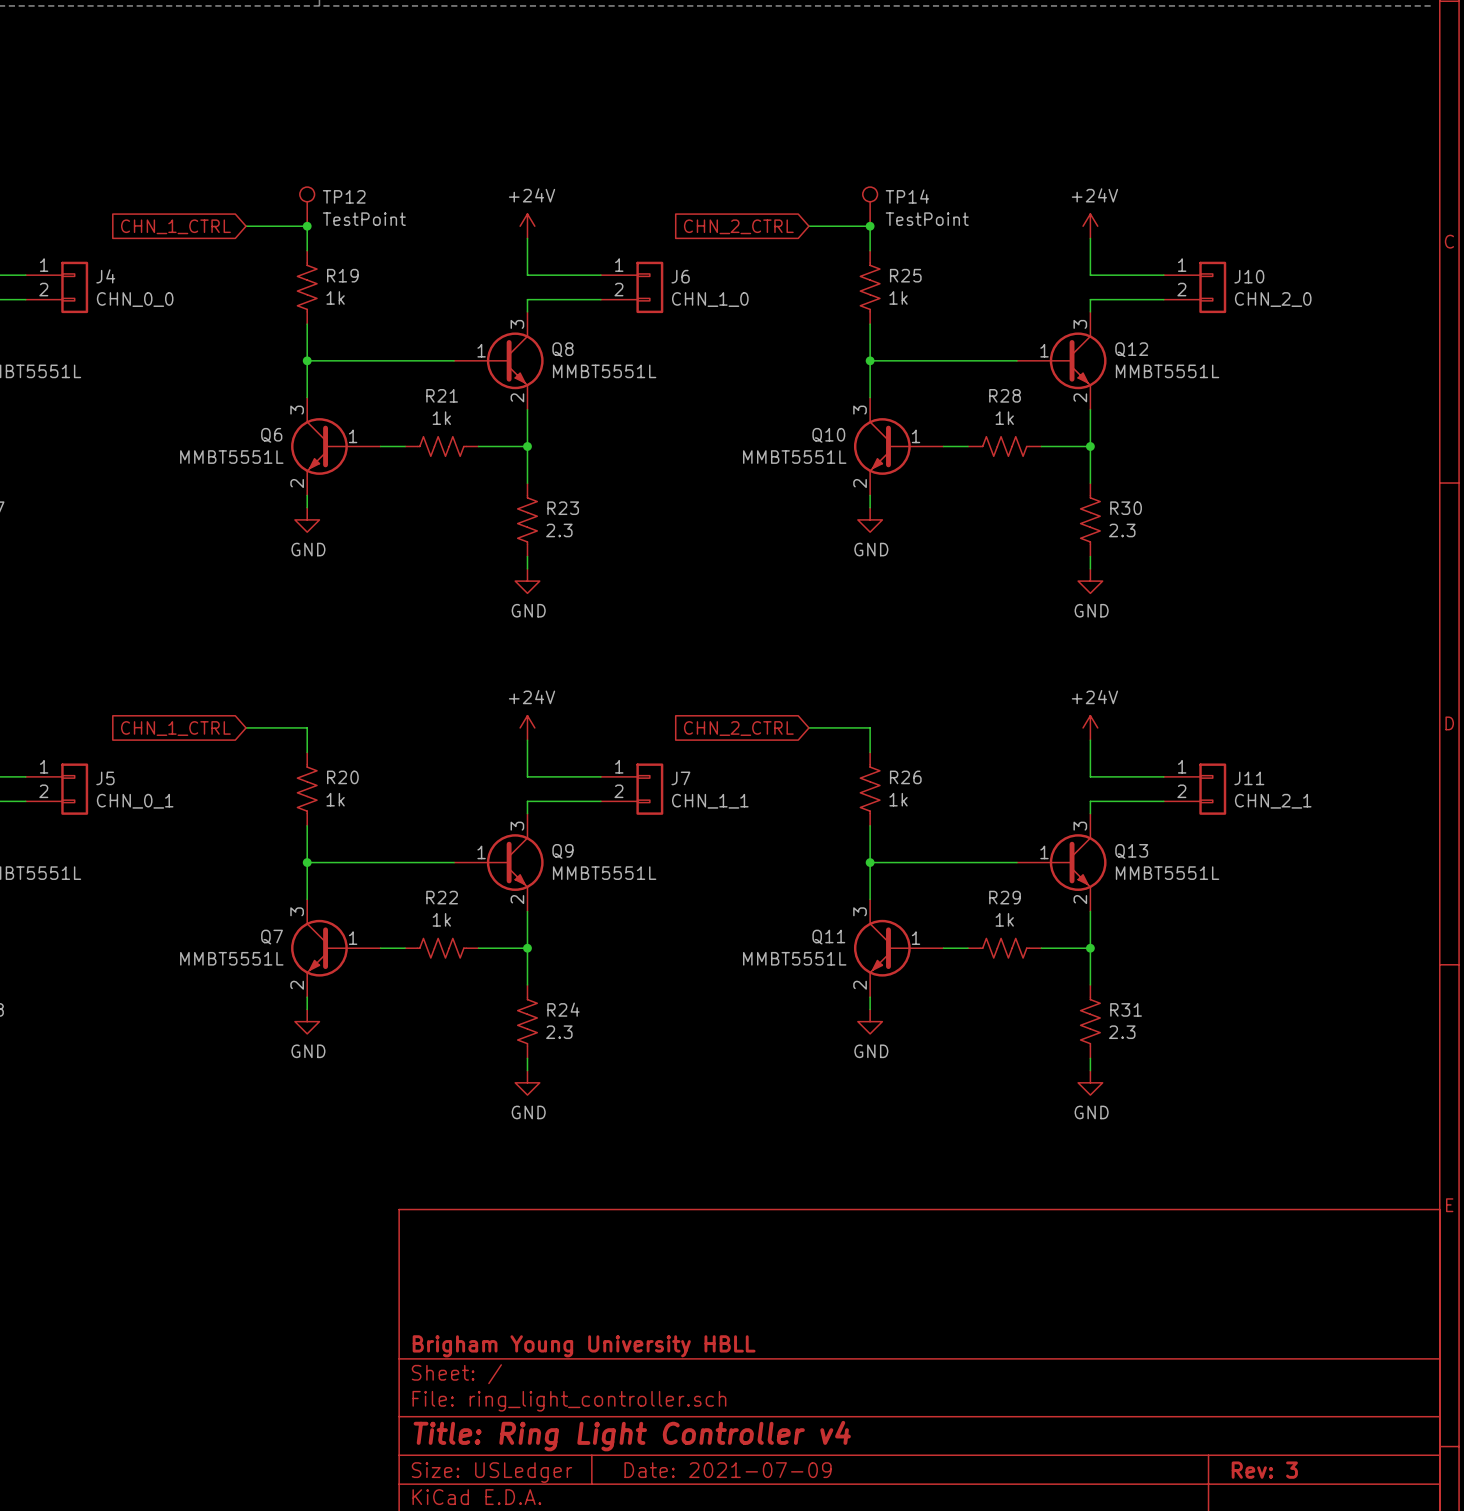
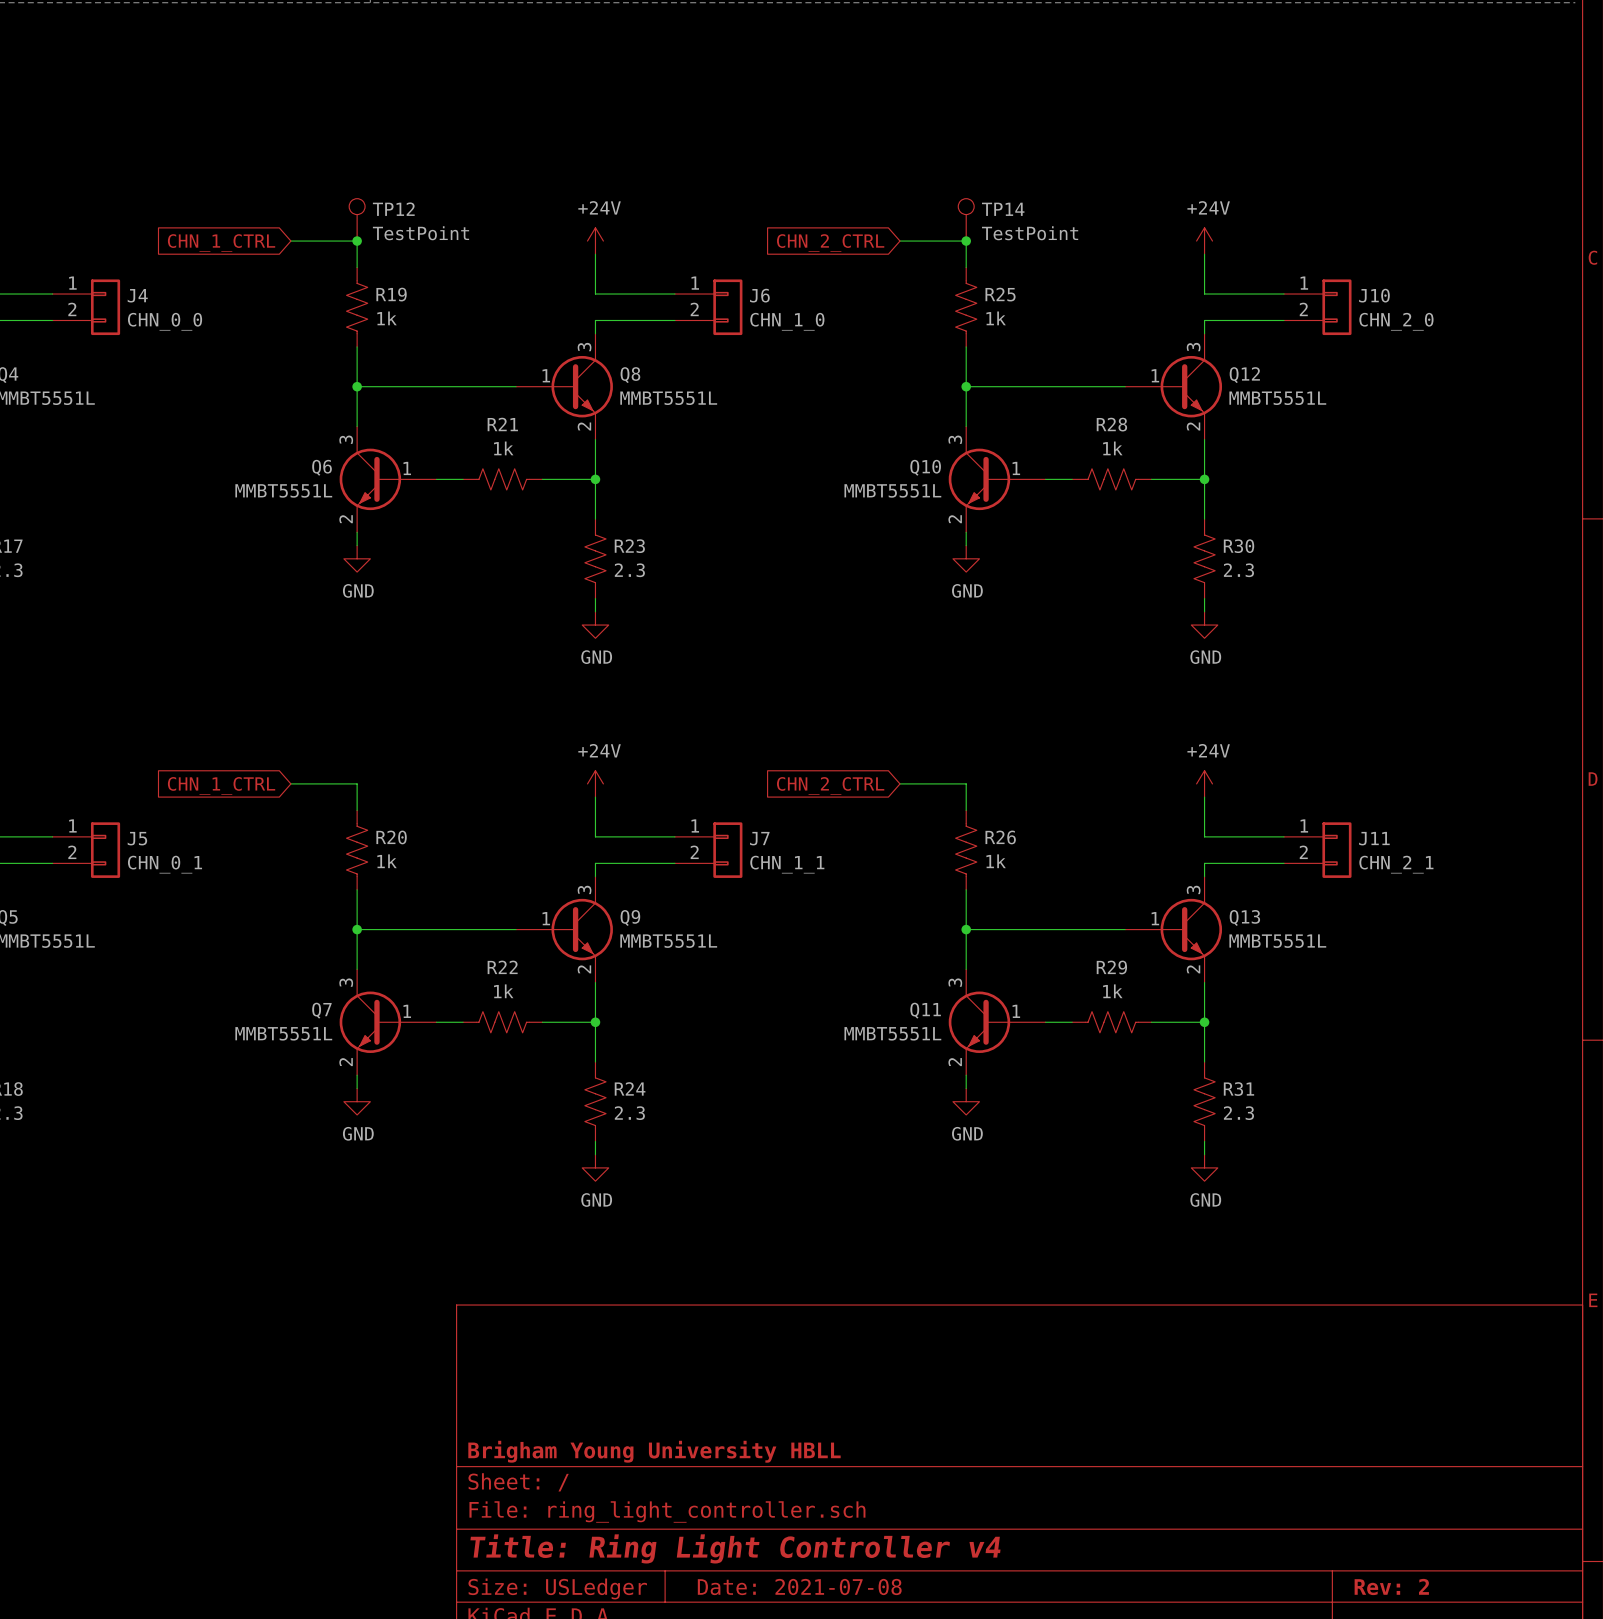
title block: Date: 2021-07-09 (728, 1470) -> Date: 2021-07-08 (799, 1586)
title block: Rev: 3 (1264, 1470) -> Rev: 2 (1391, 1586)

